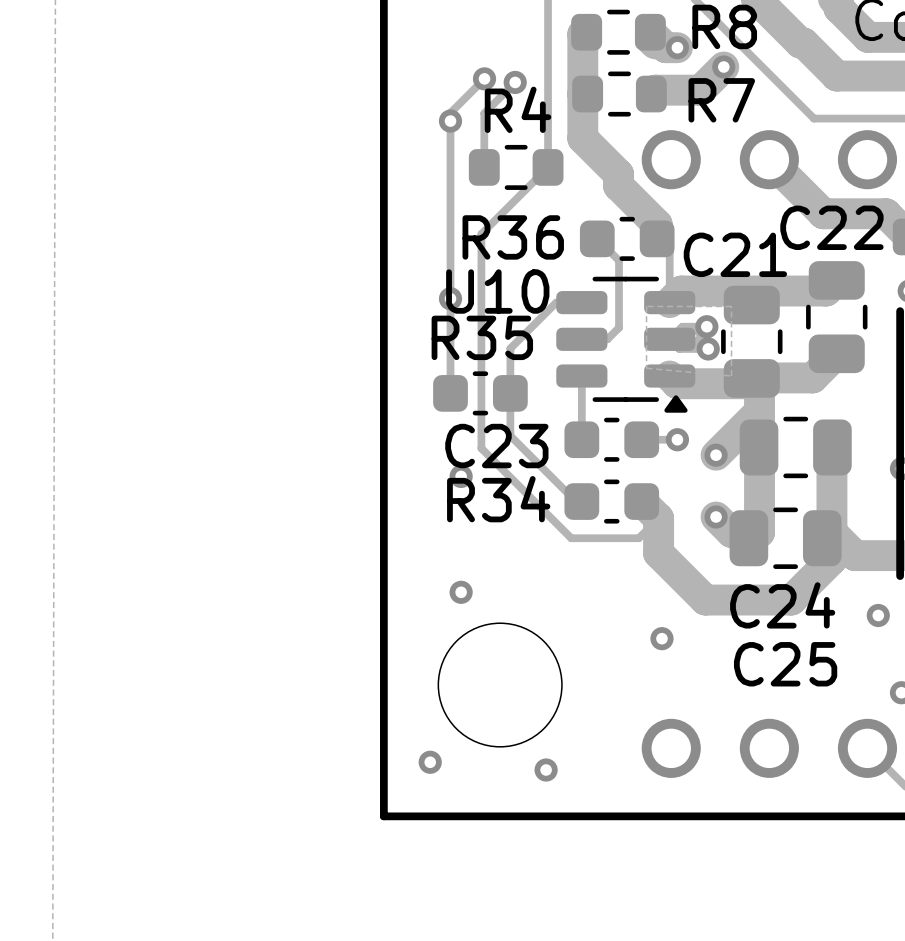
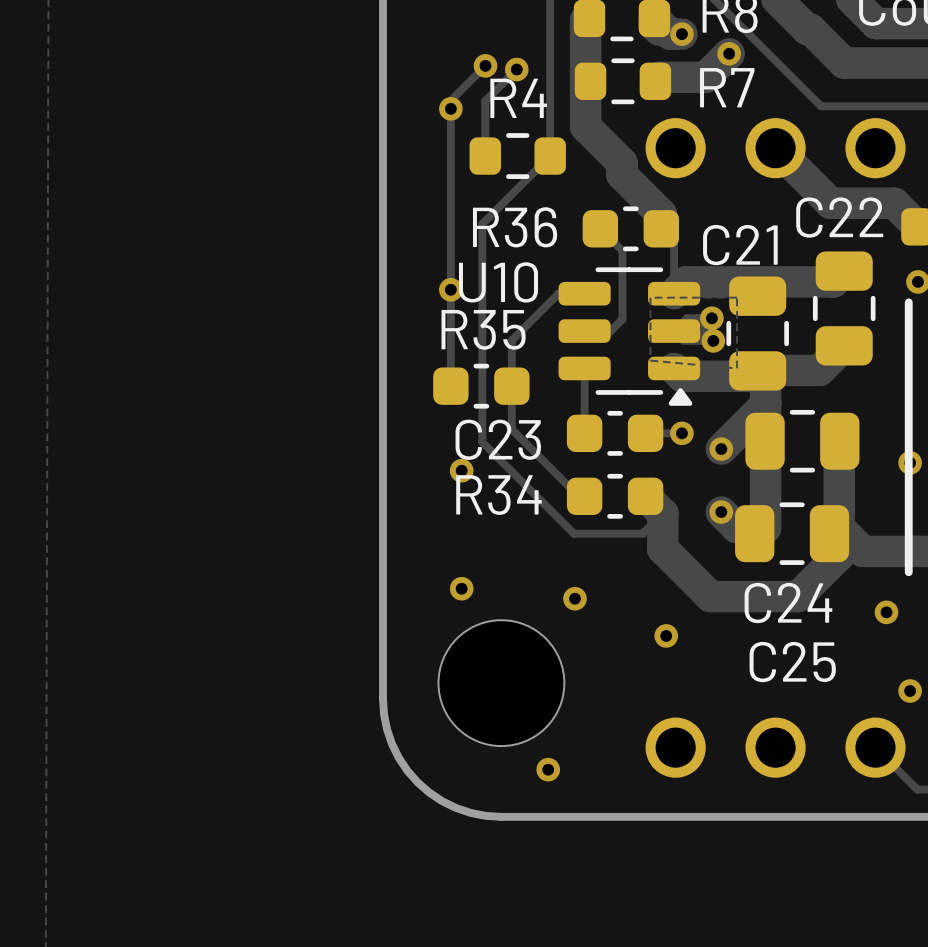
board edge: (383, 700) (383, 816) (499, 816) -> (383, 698) (384, 714) (392, 744) (398, 757) (417, 782) (442, 801) (455, 807) (485, 815) (501, 816)
via position: (430, 762) -> (574, 598)

